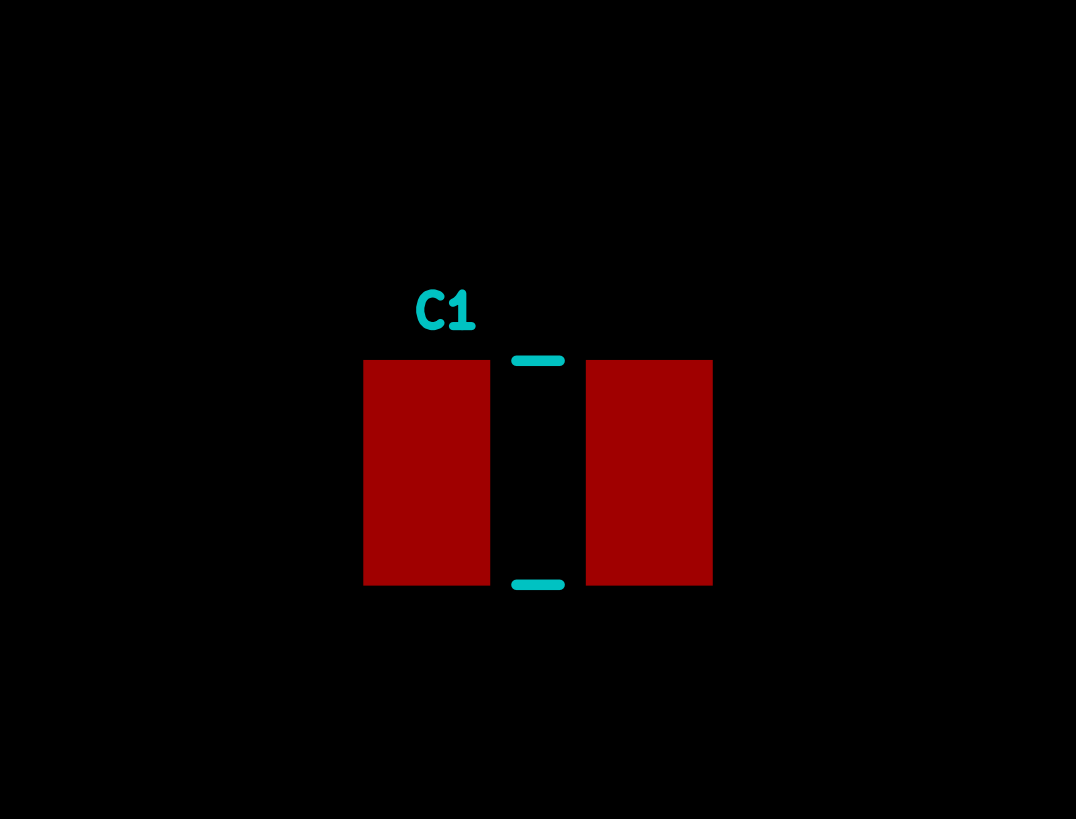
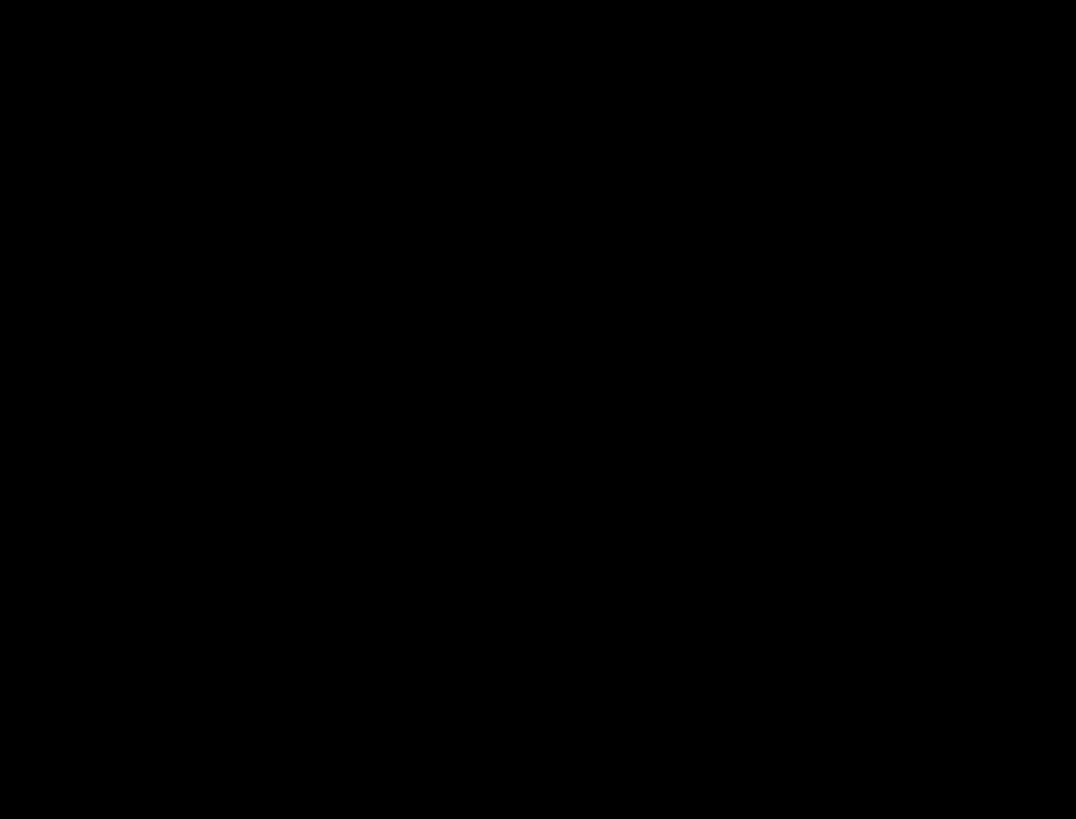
C1: (538, 472) -> none

